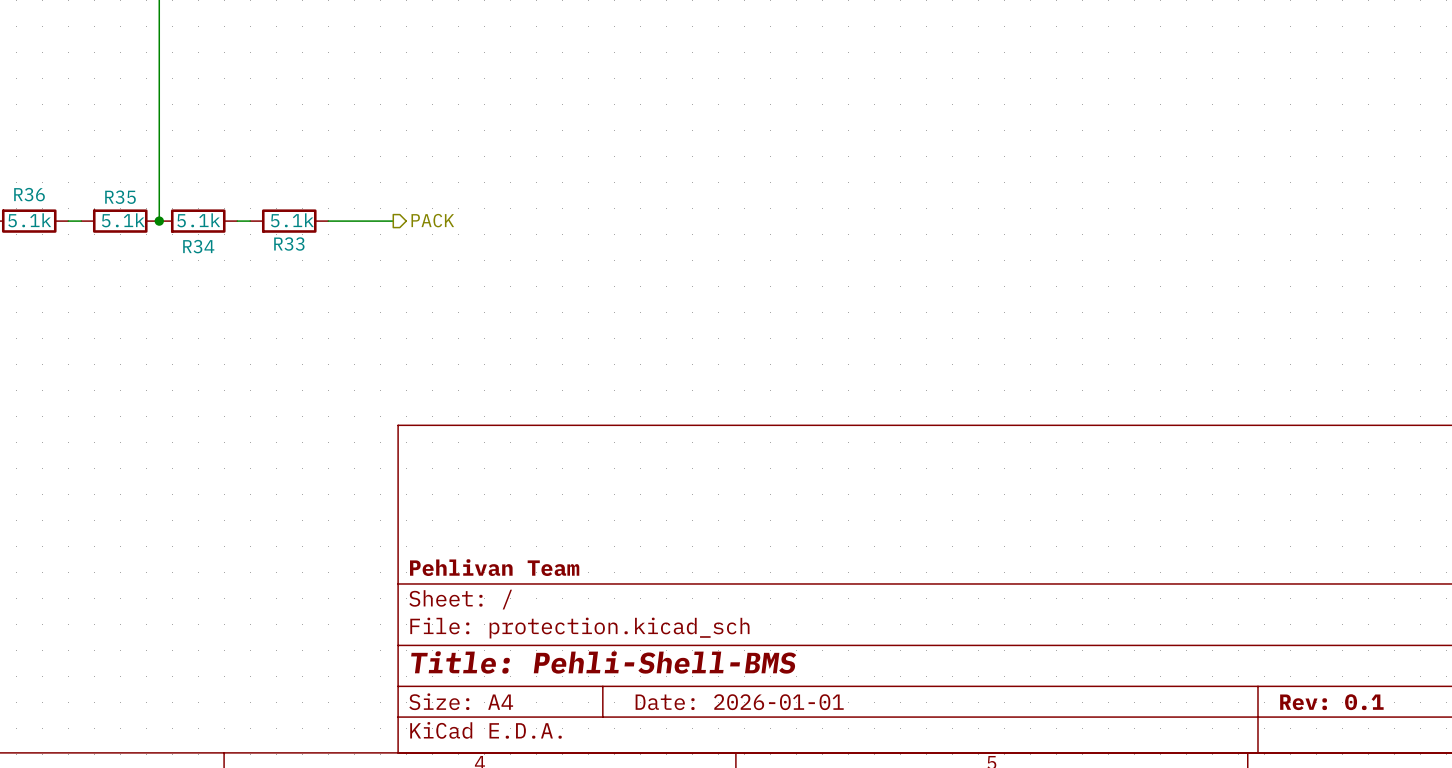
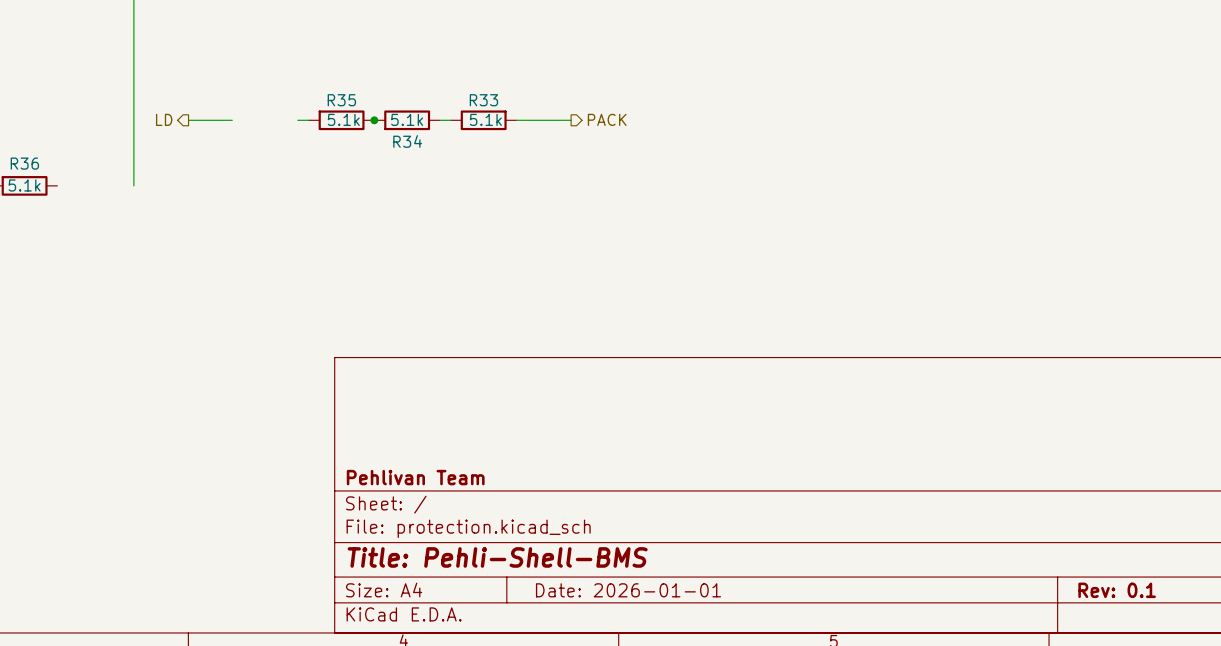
hierarchical label: none -> LD (164, 119)
hierarchical label: none -> PACK (607, 119)
wire: none -> (188, 120) (232, 120)
junction: none -> (374, 120)
wire: none -> (439, 120) (450, 120)
wire: none -> (516, 120) (571, 120)
hierarchical label: PACK (432, 220) -> none
wire: (68, 221) (81, 221) -> none
R35 position: (120, 221) -> (341, 120)
junction: (159, 221) -> none
R34 position: (198, 221) -> (407, 120)
wire: (237, 221) (250, 221) -> (297, 120) (308, 120)
R33 position: (289, 221) -> (483, 120)
wire: (328, 221) (393, 221) -> none
R33 name position: R33 (289, 244) -> R33 (483, 100)

